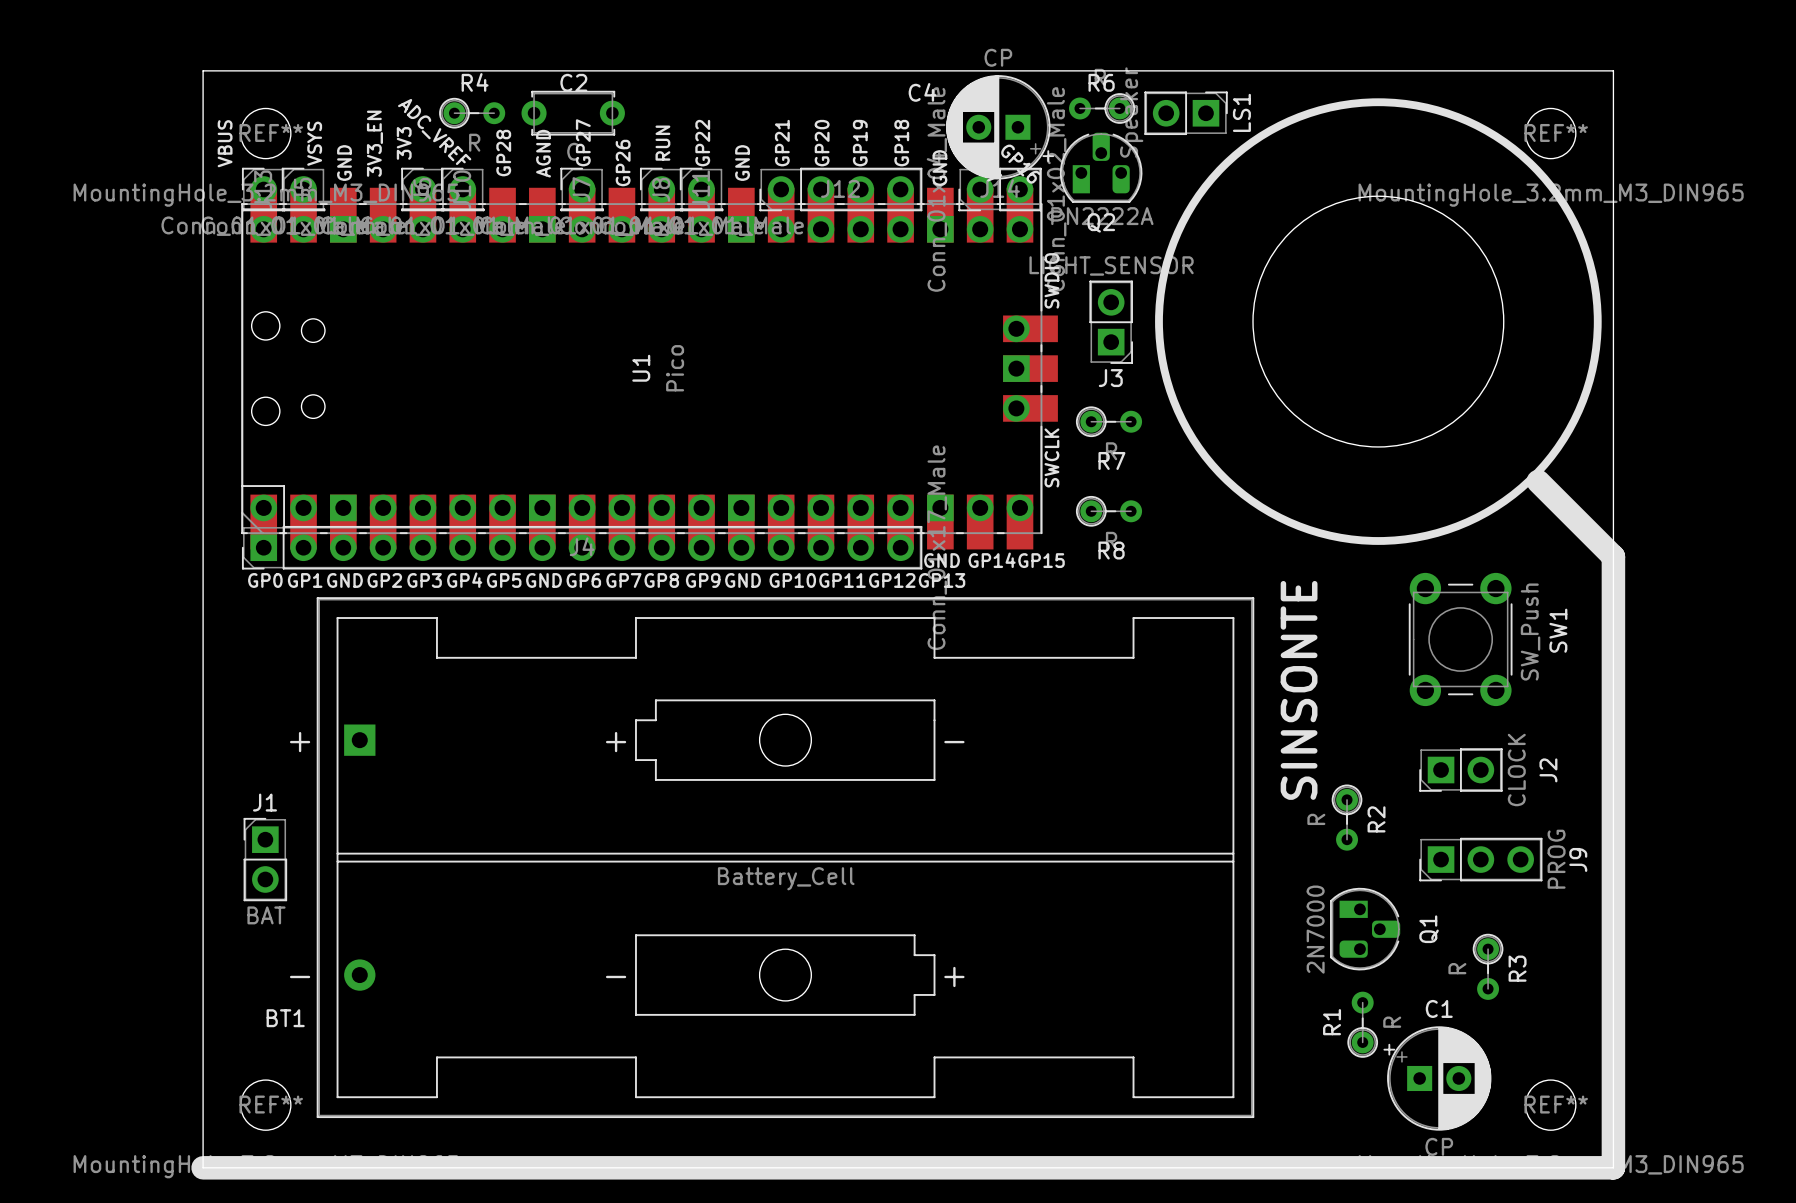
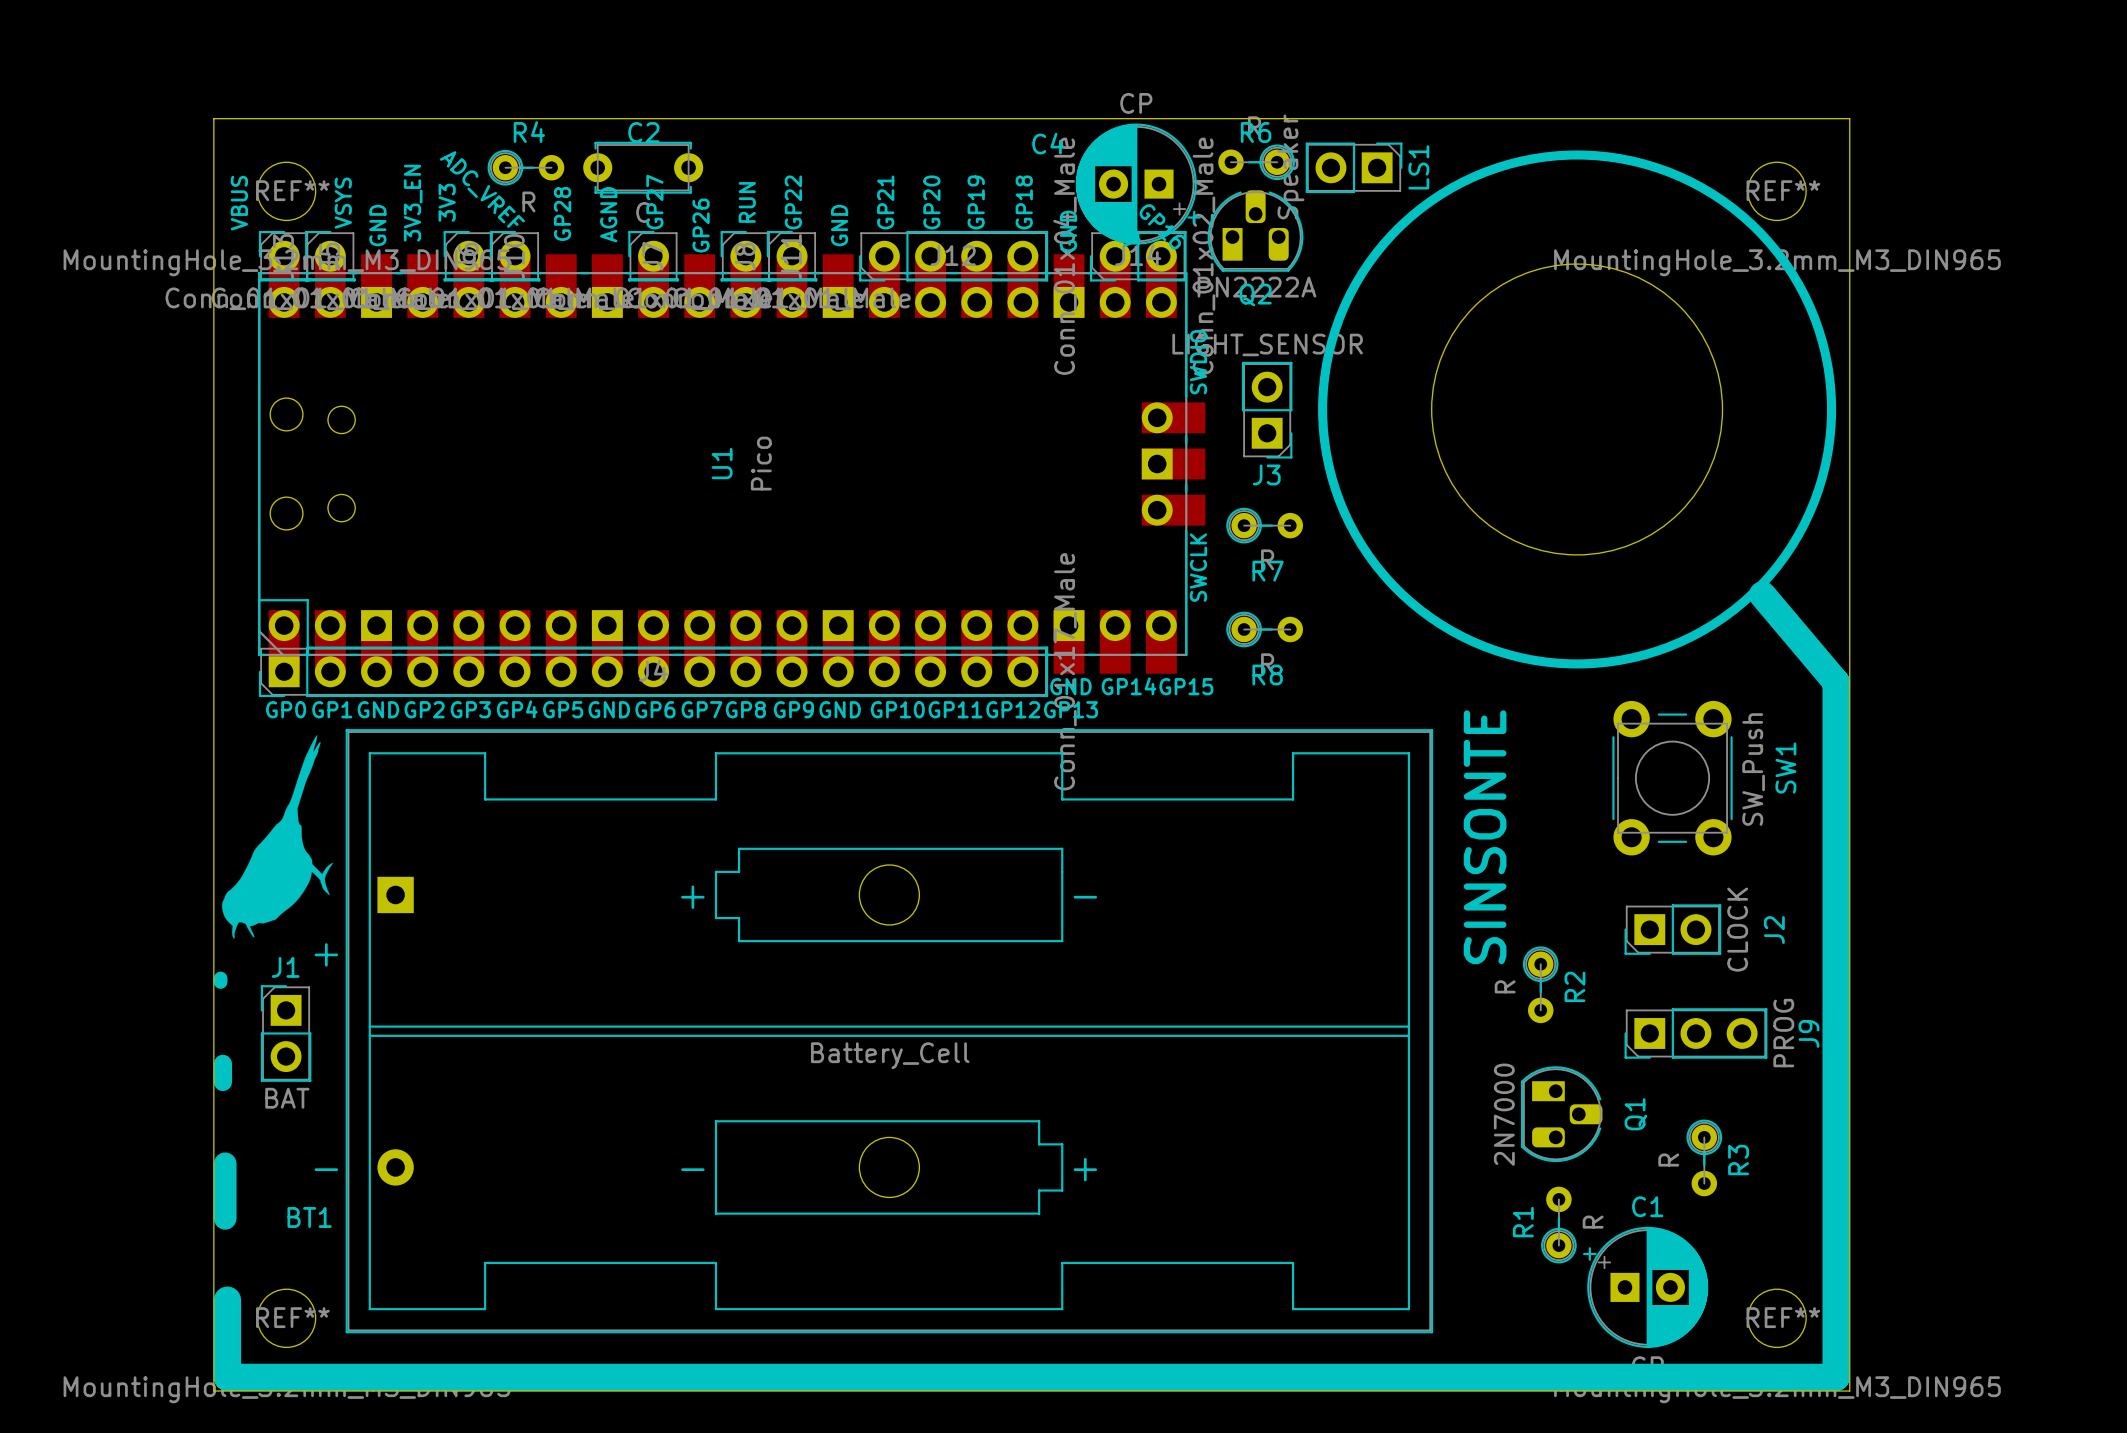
line: (1538, 481) (1613, 556) (1613, 1167) (203, 1167) -> (1762, 594) (1836, 682) (1836, 1377) (227, 1377) (227, 1300)
drawing: none -> [222, 735, 334, 939]
BT1 text position: + (300, 742) -> + (326, 954)
line: none -> (220, 978) (220, 982)
line: none -> (222, 1063) (222, 1082)
line: none -> (225, 1163) (225, 1218)

